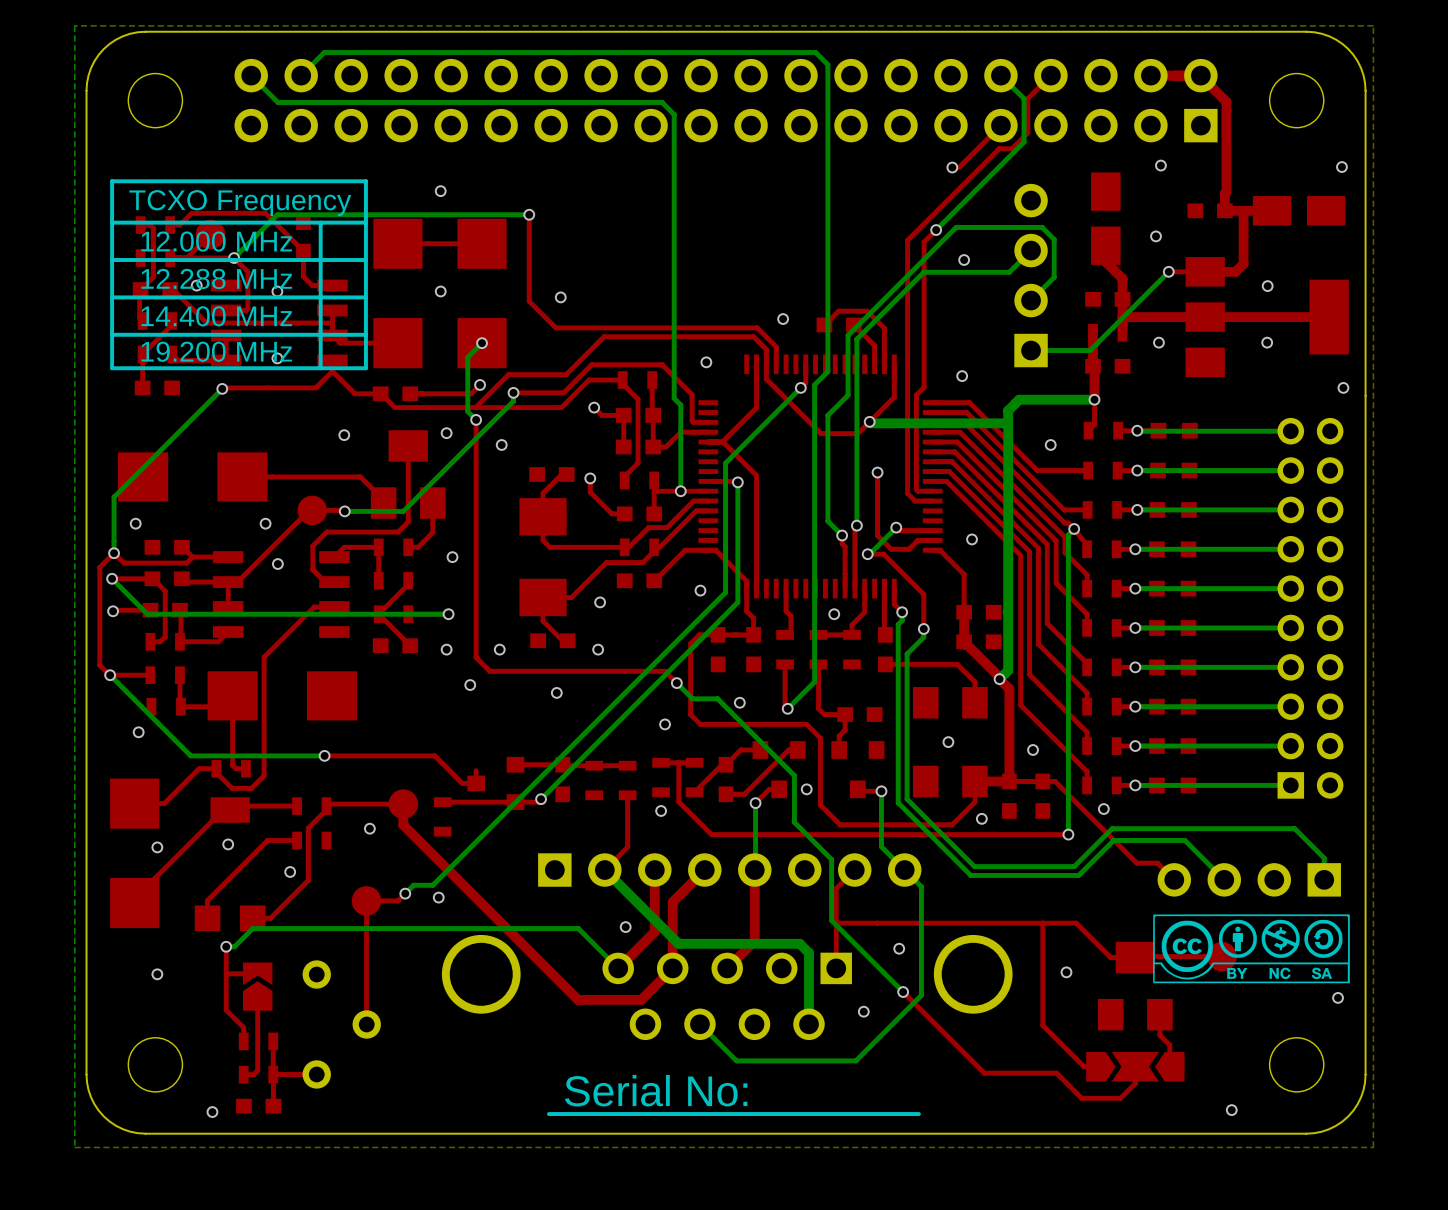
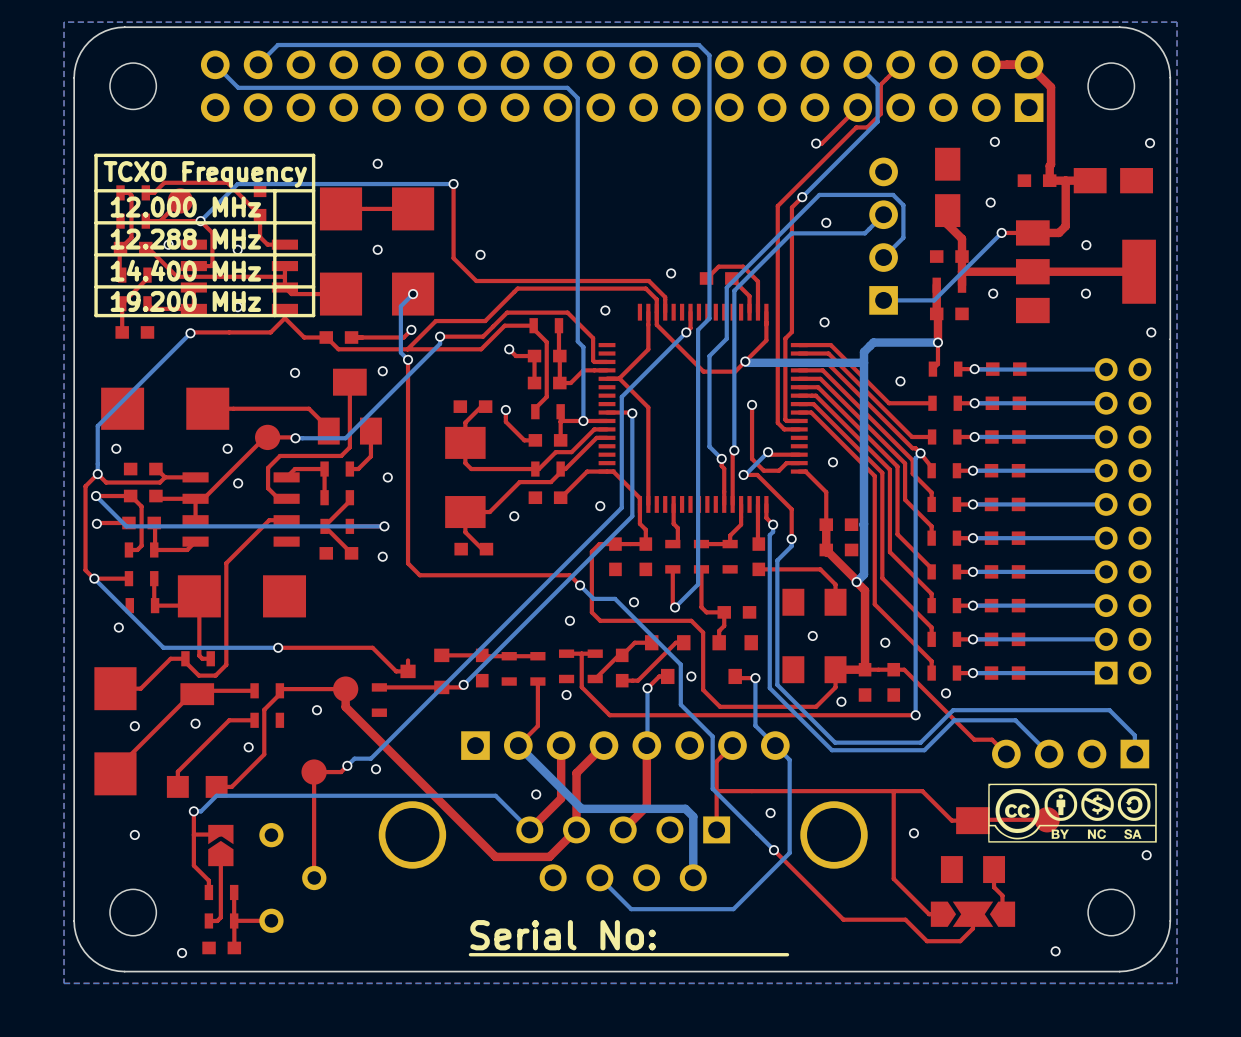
via: (501, 444) -> none
via: (834, 614) -> none
via: (499, 649) -> none
via: (598, 649) -> none
via: (470, 685) -> none
via: (556, 692) -> none
via: (863, 1011) -> none

